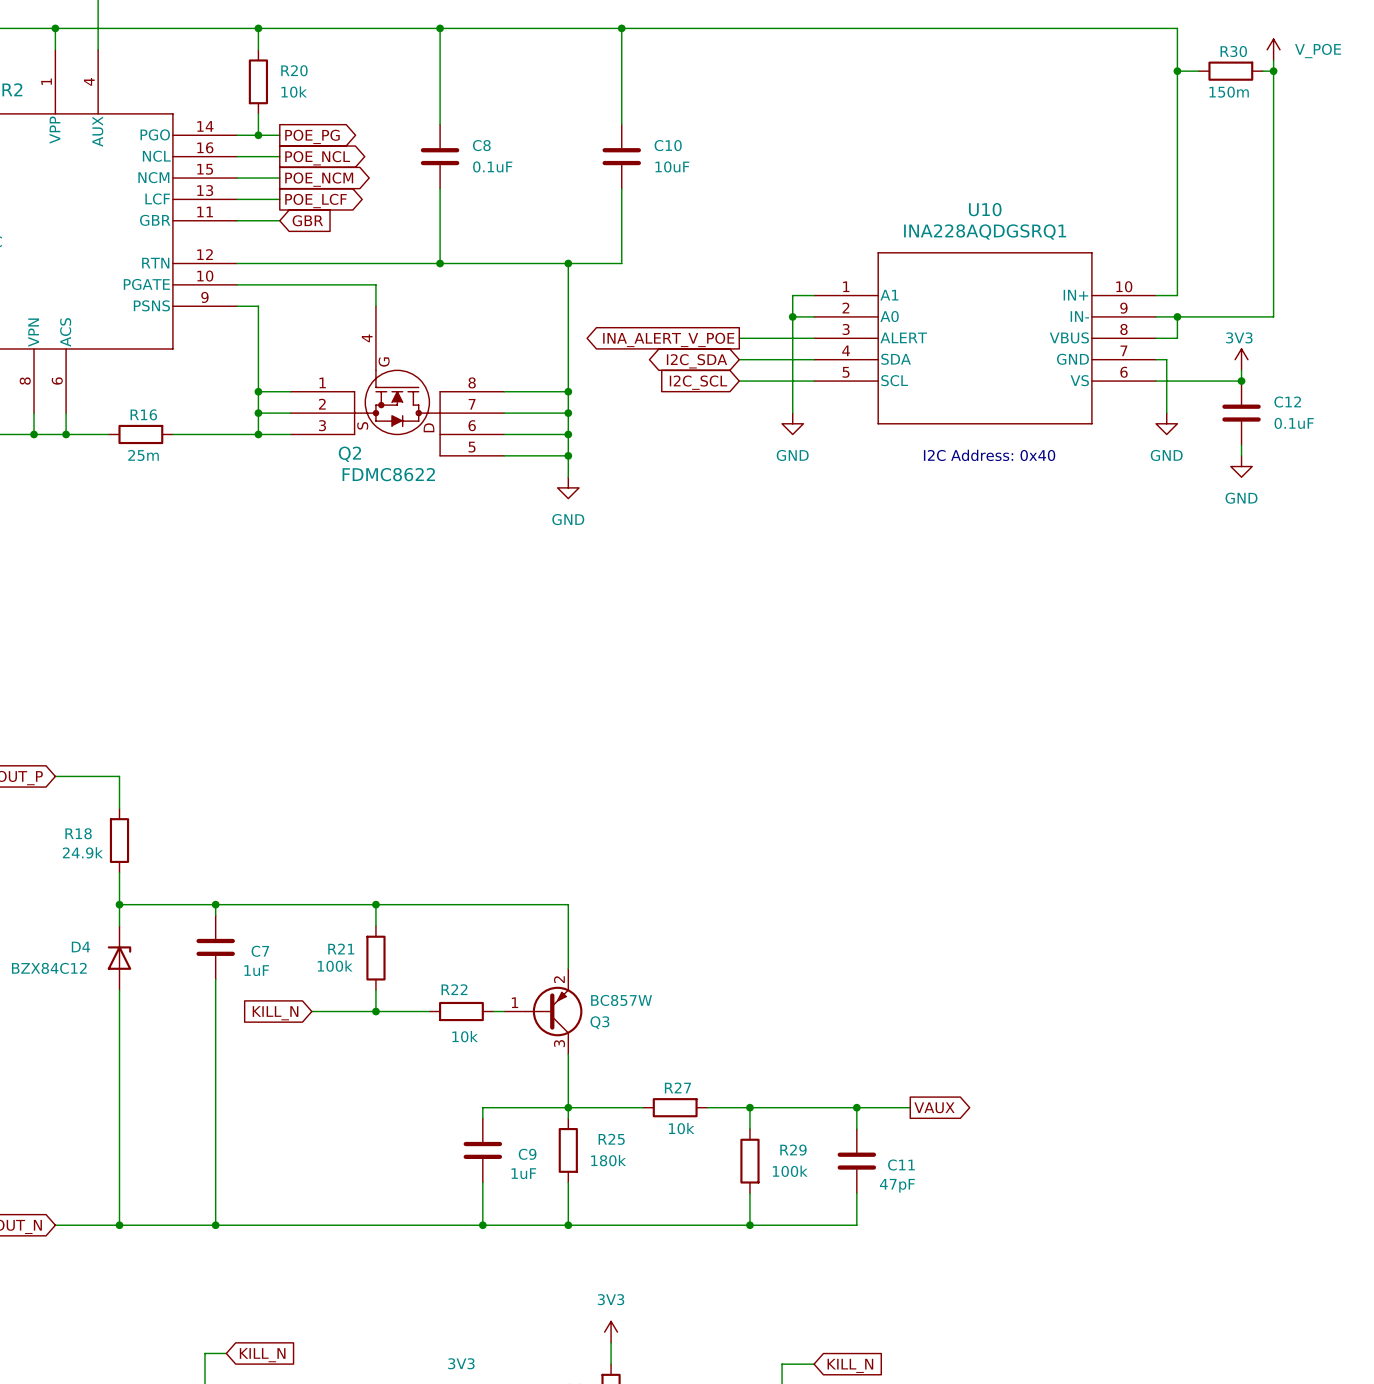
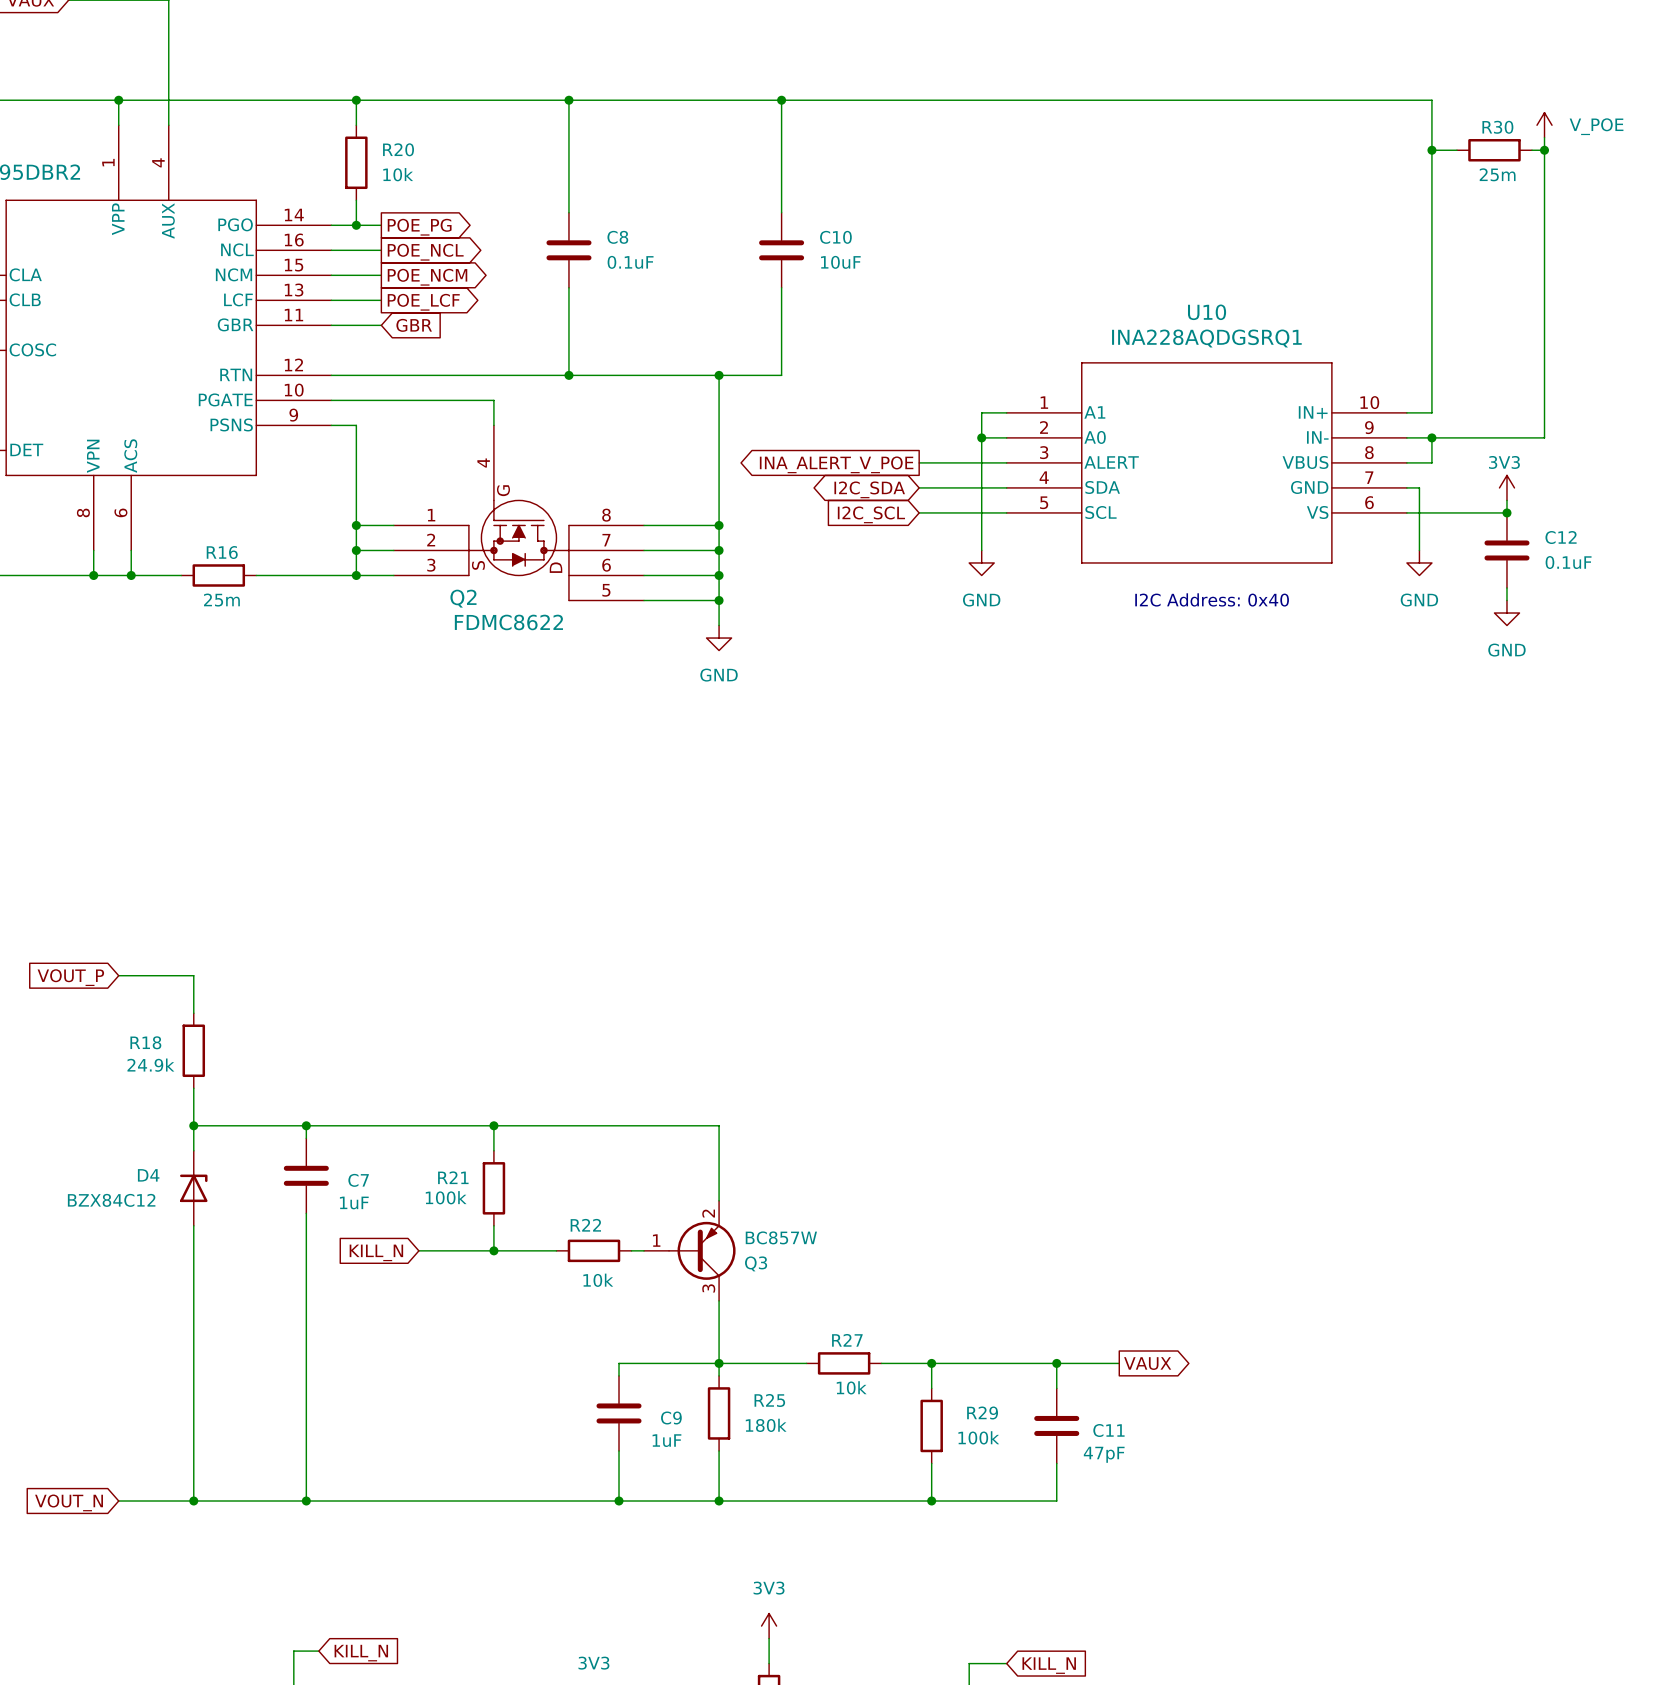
R30 value: 150m (1229, 92) -> 25m (1497, 174)

